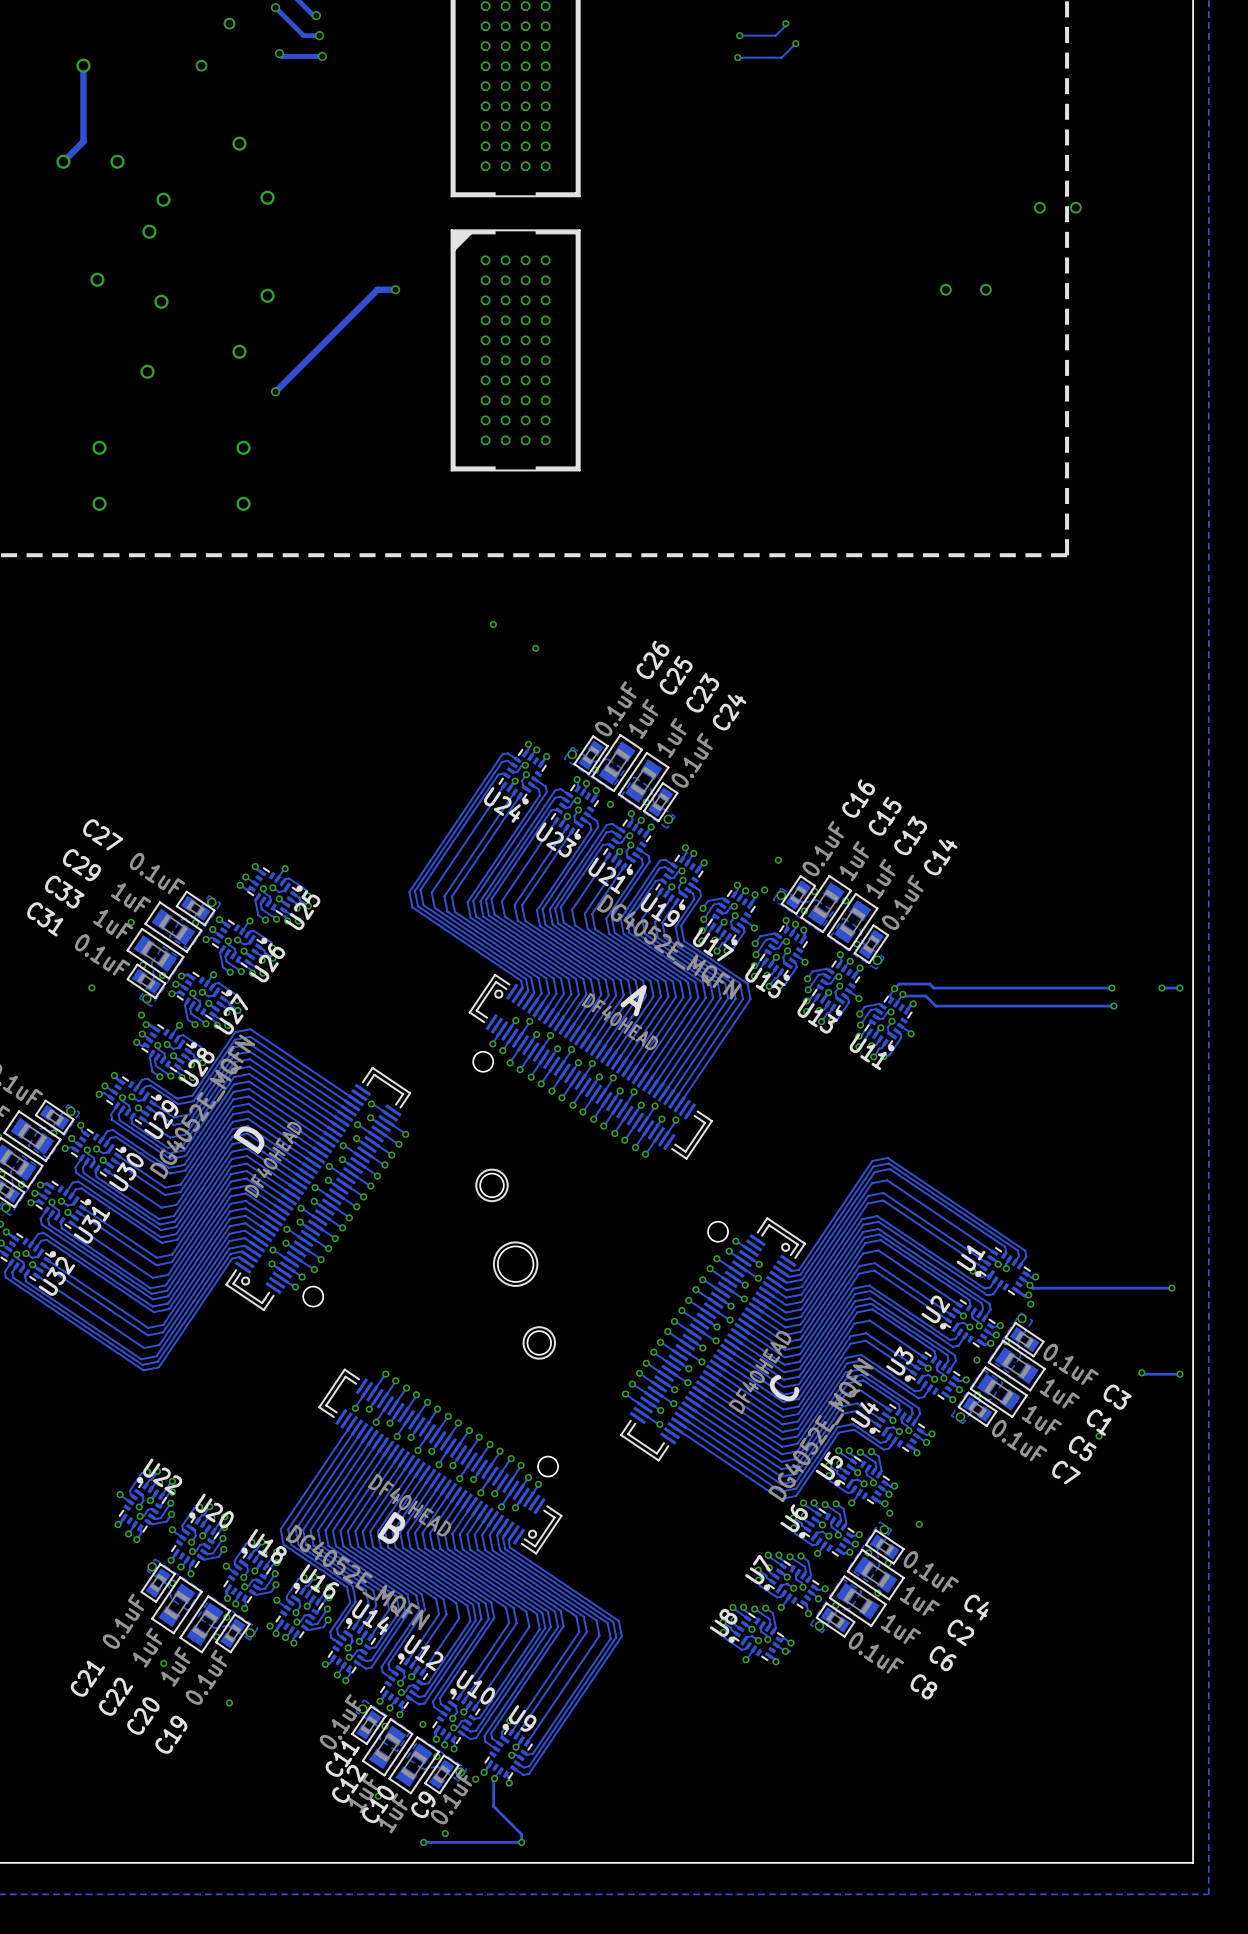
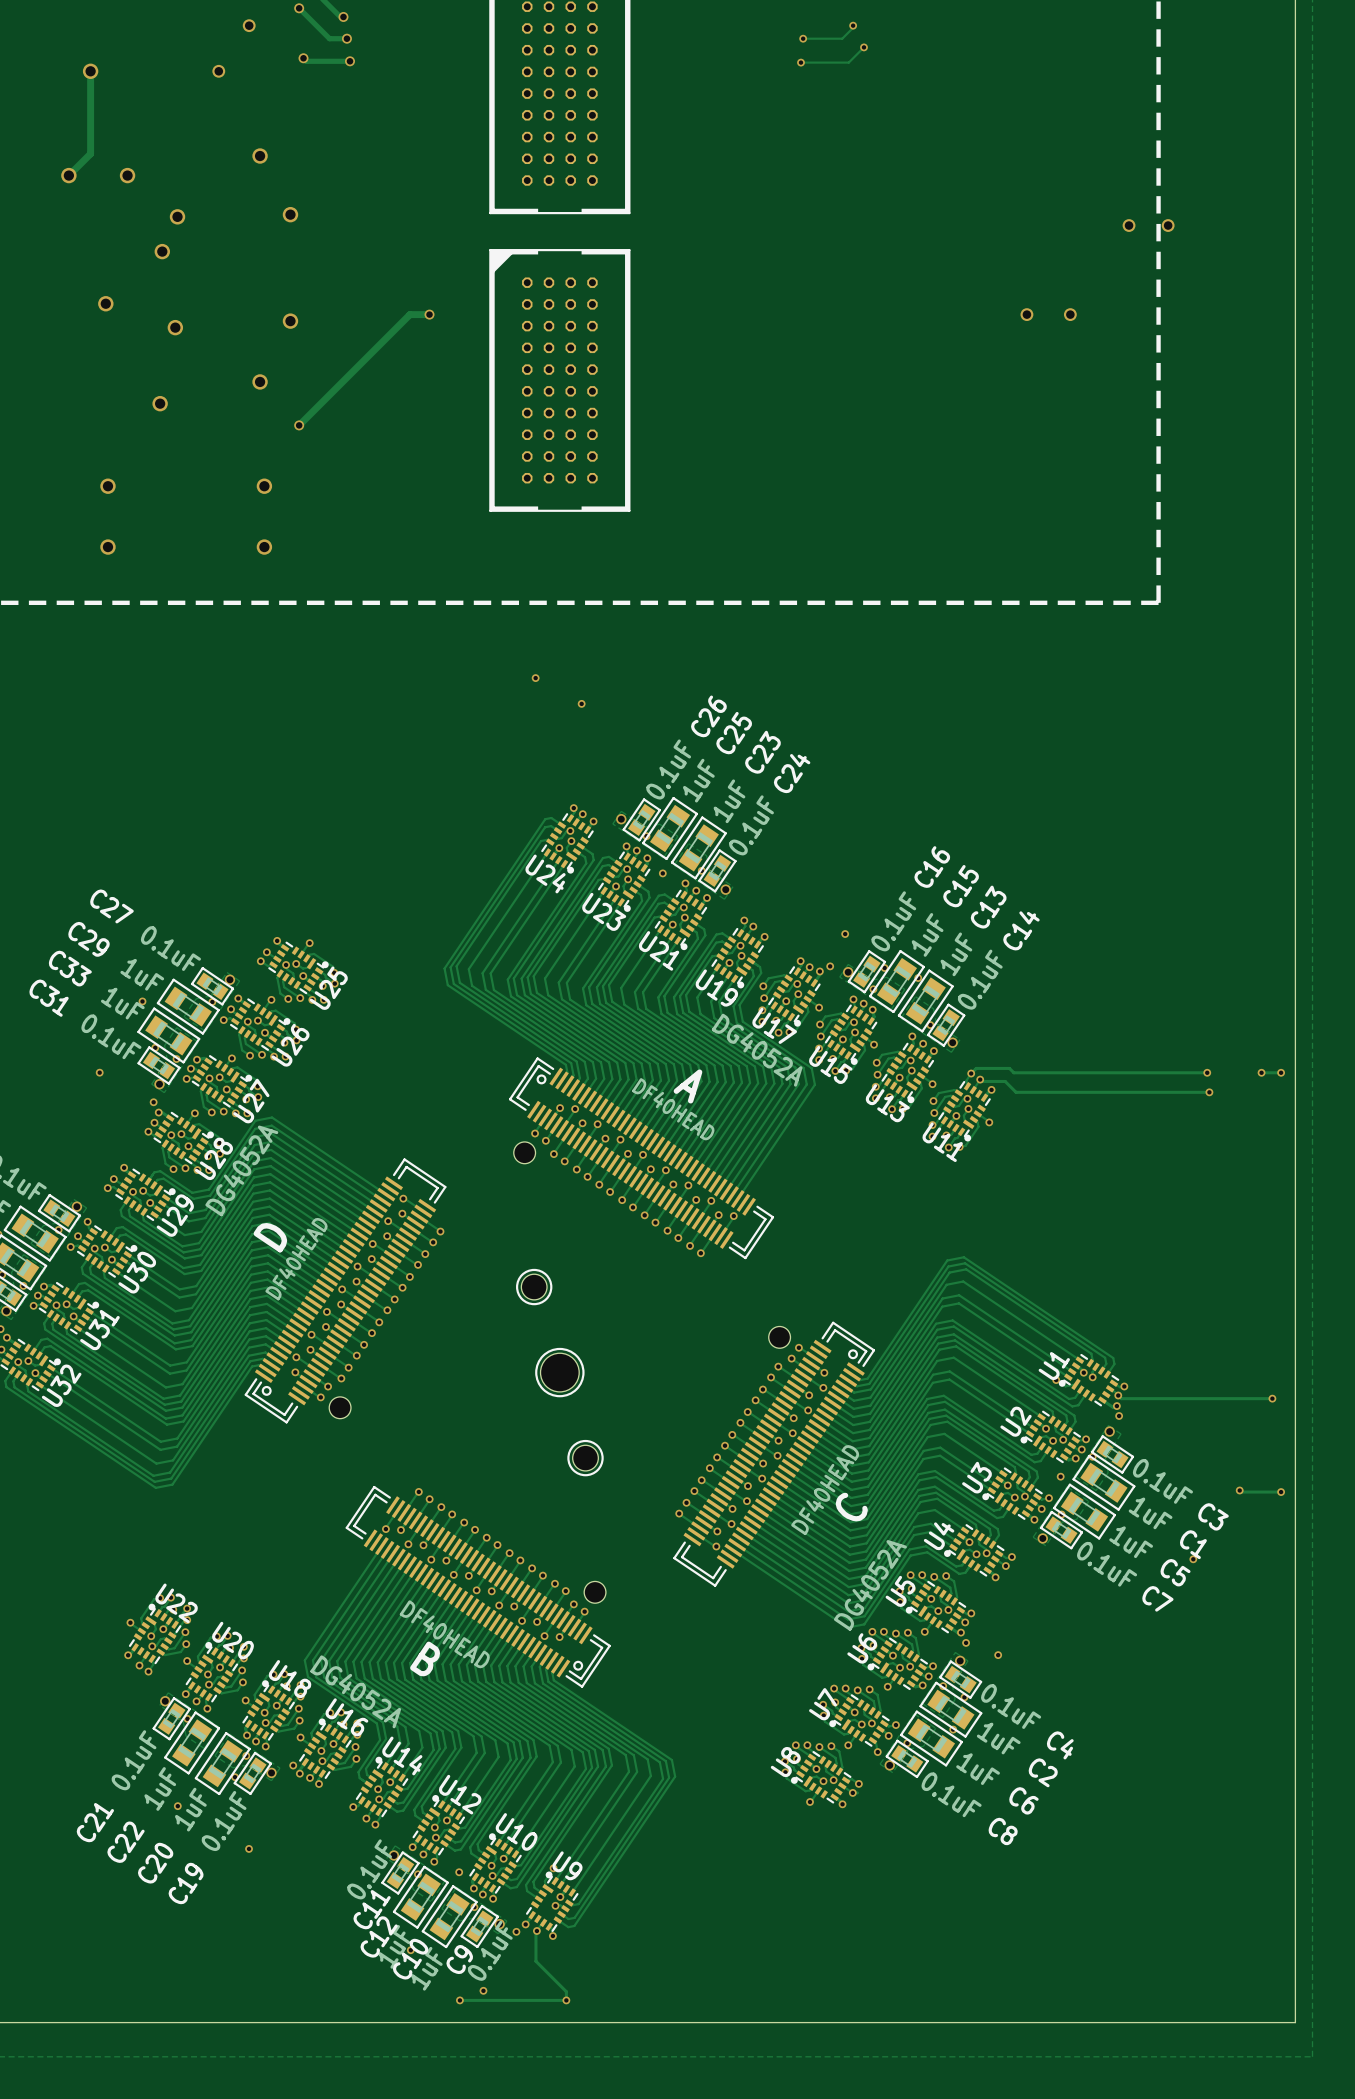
U15 value: DG4052E_MQFN (669, 946) -> DG4052A (757, 1050)
U27 value: DG4052E_MQFN (202, 1106) -> DG4052A (241, 1170)
U6 value: DG4052E_MQFN (820, 1429) -> DG4052A (870, 1585)
U18 value: DG4052E_MQFN (358, 1577) -> DG4052A (355, 1691)

